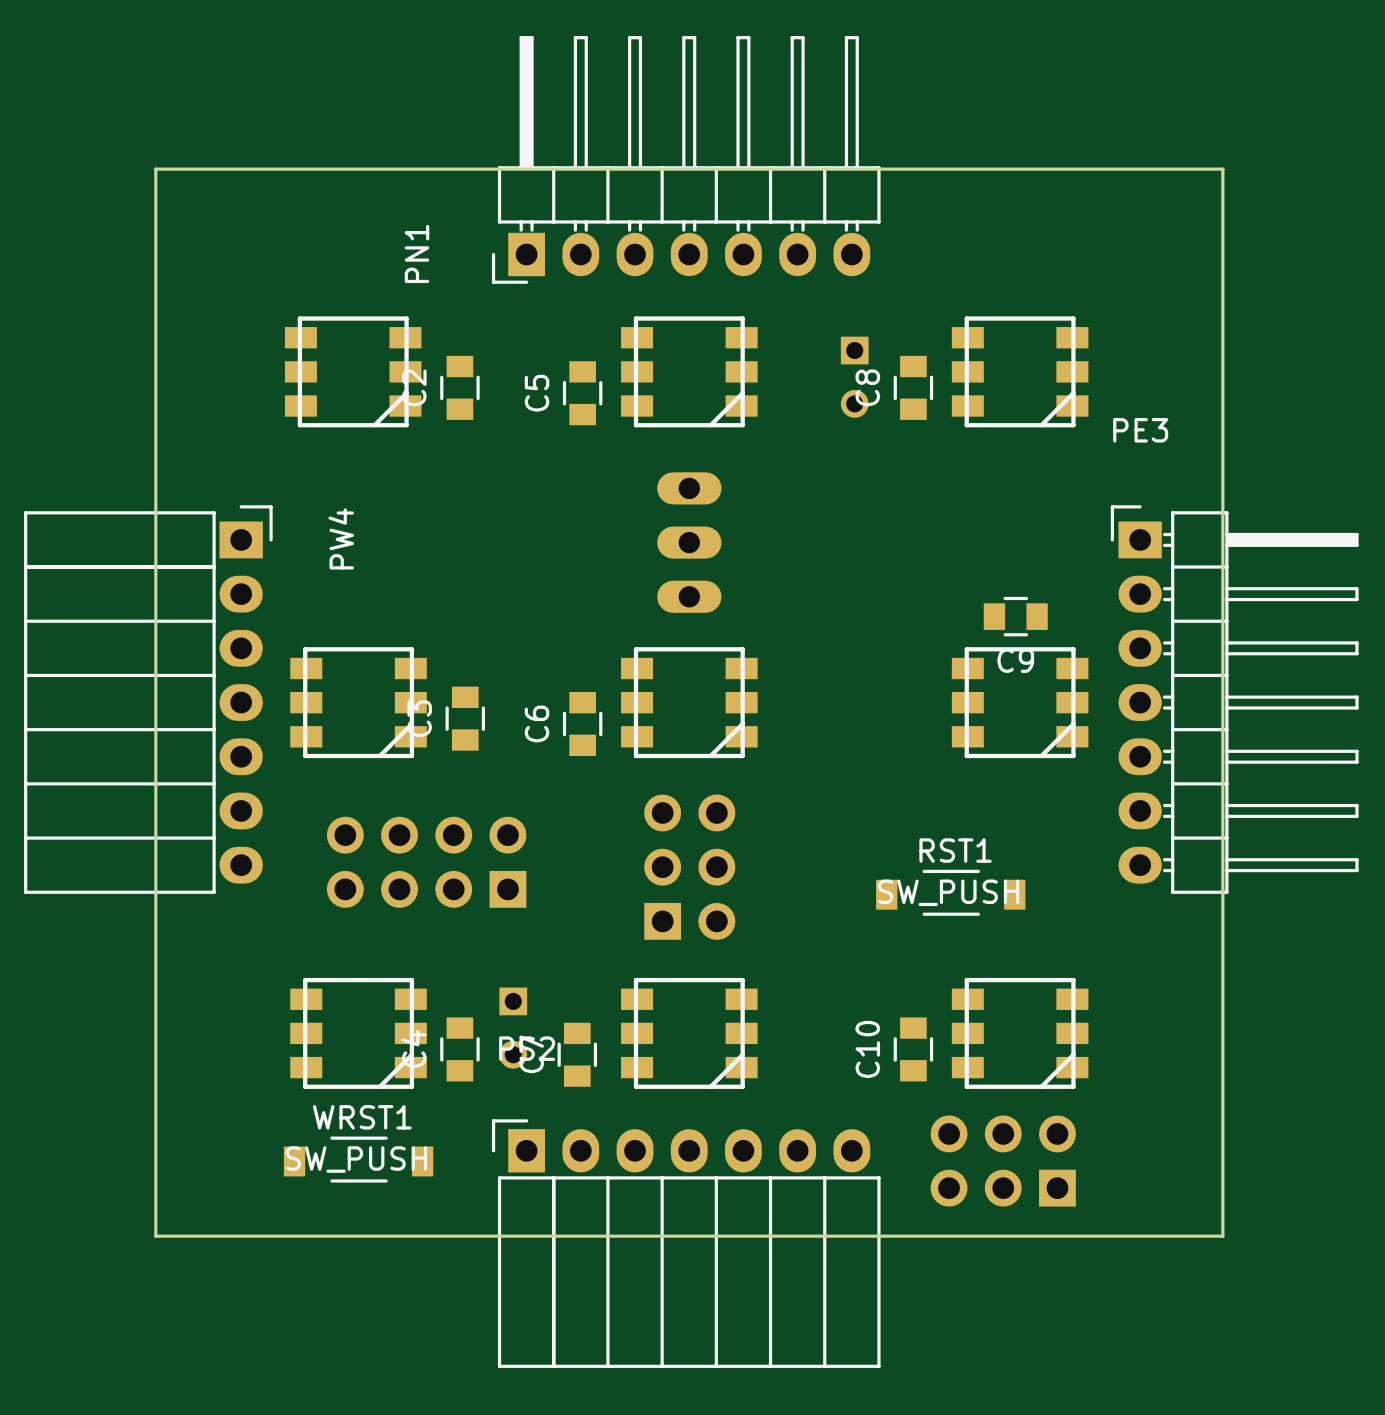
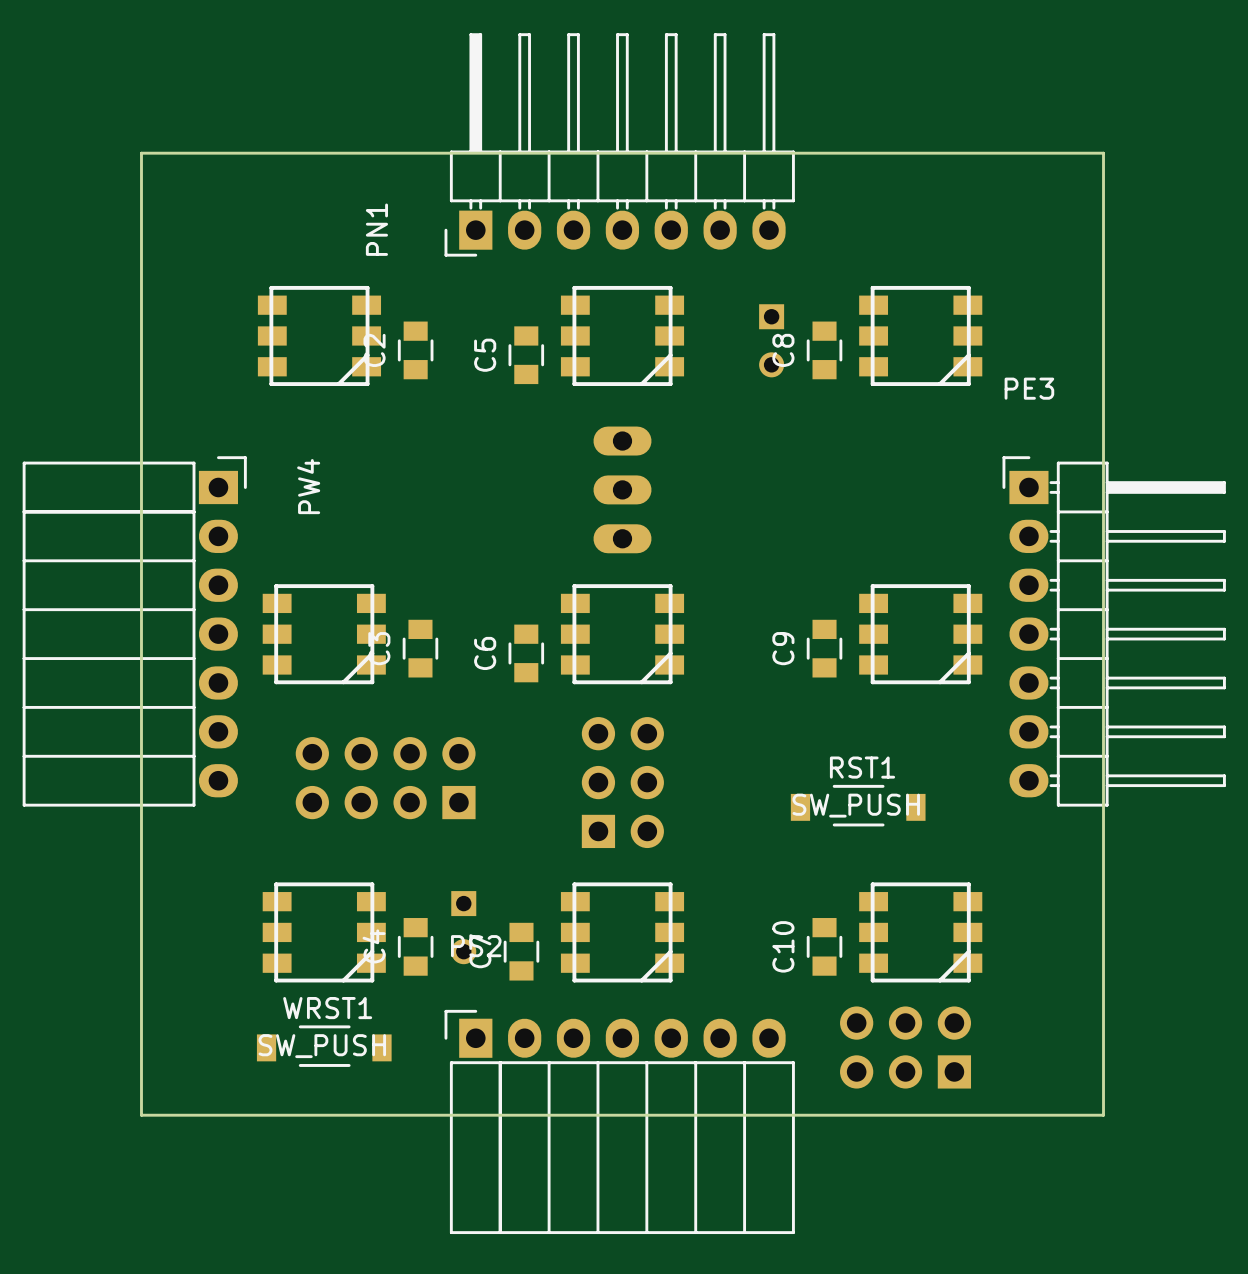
C9 rotation: 0° (1015, 616) -> 90° clockwise (824, 648)
C9 position: (1015, 616) -> (824, 648)

